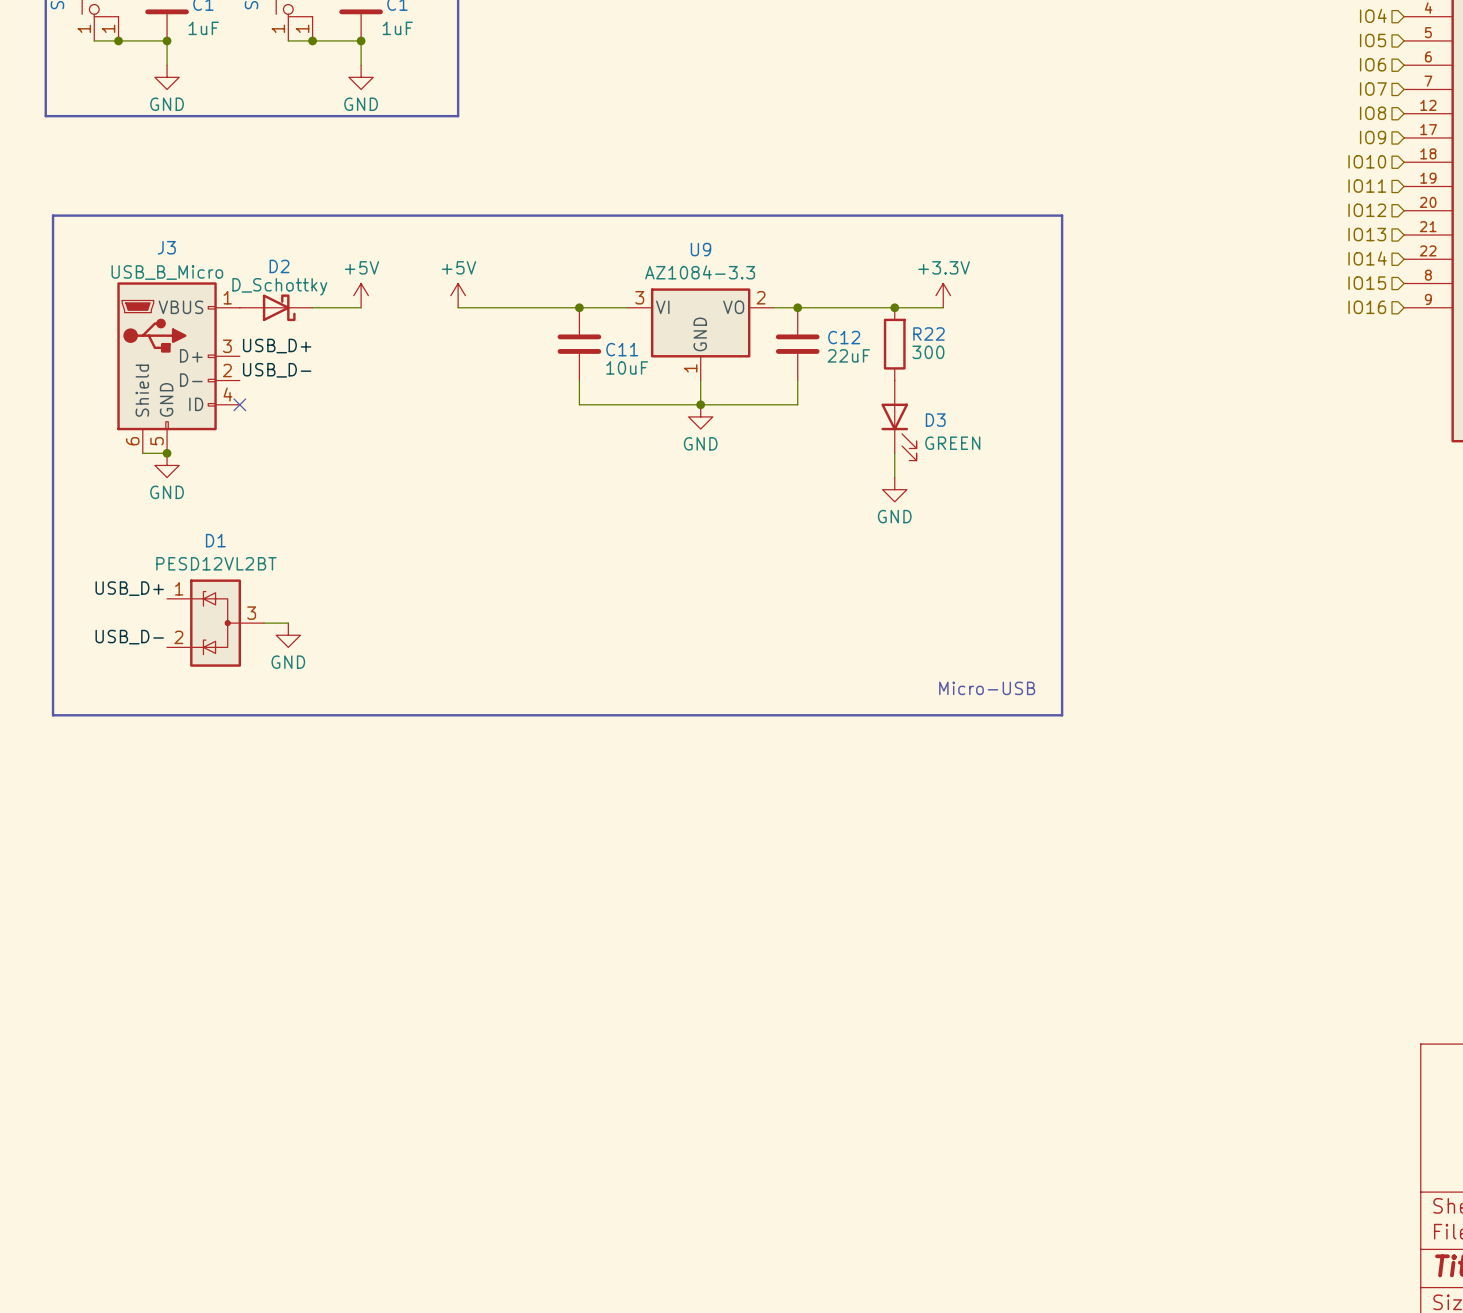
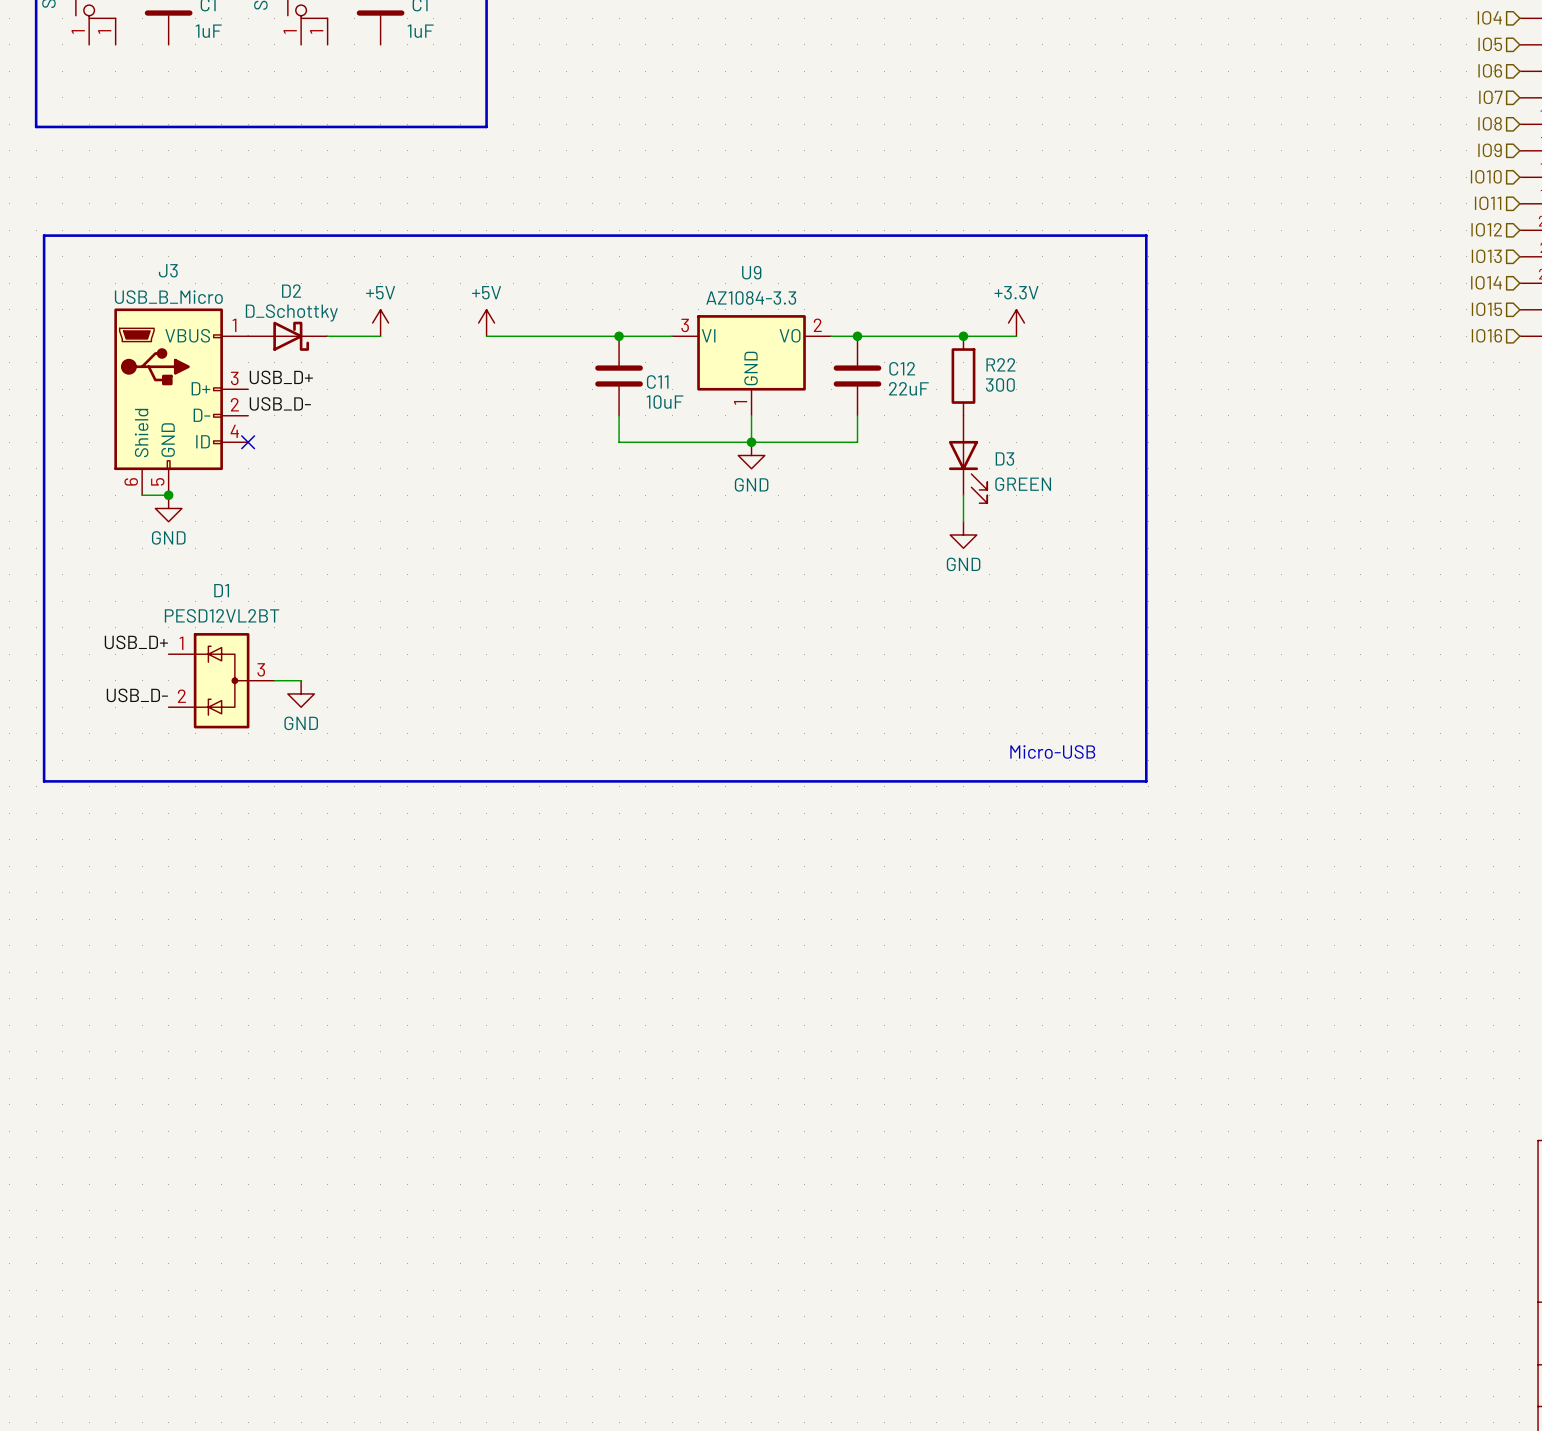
wire: (94, 40) (167, 40) (167, 65) -> none
junction: (118, 40) -> none
junction: (167, 40) -> none
wire: (288, 40) (361, 40) (361, 65) -> none
junction: (312, 40) -> none
junction: (361, 40) -> none
power symbol: GND (167, 77) -> none
power symbol: GND (361, 77) -> none

